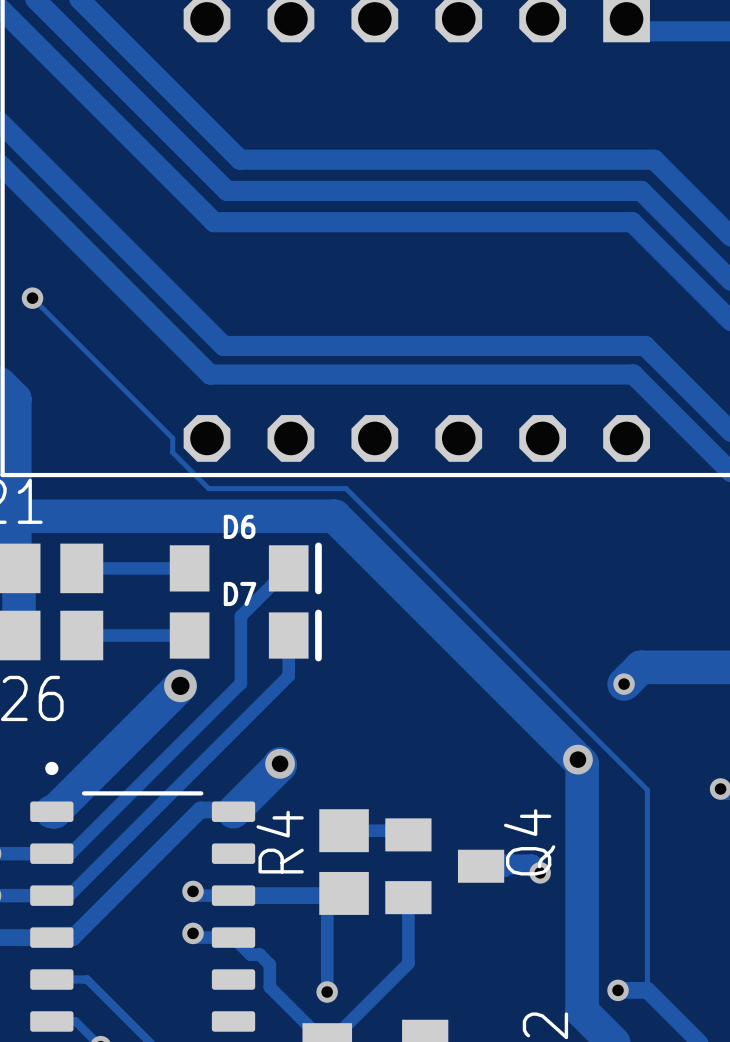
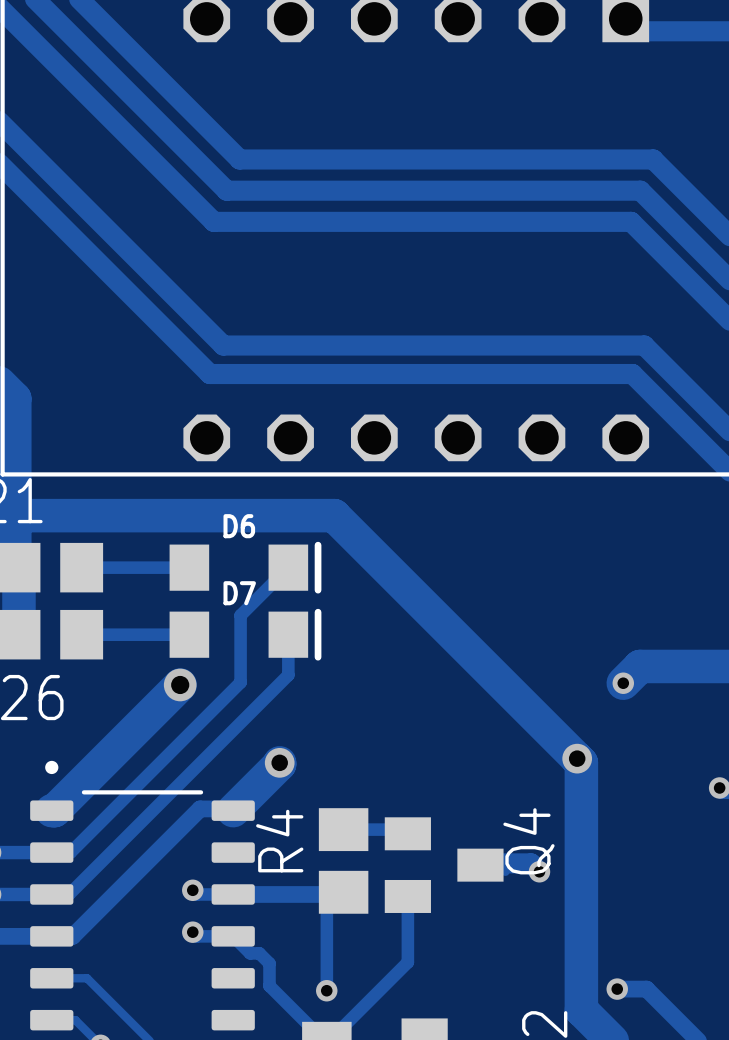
track: (32, 298) (172, 438) (172, 452) (208, 488) (346, 488) (647, 789) (647, 990) -> none
via: (32, 298) -> none

